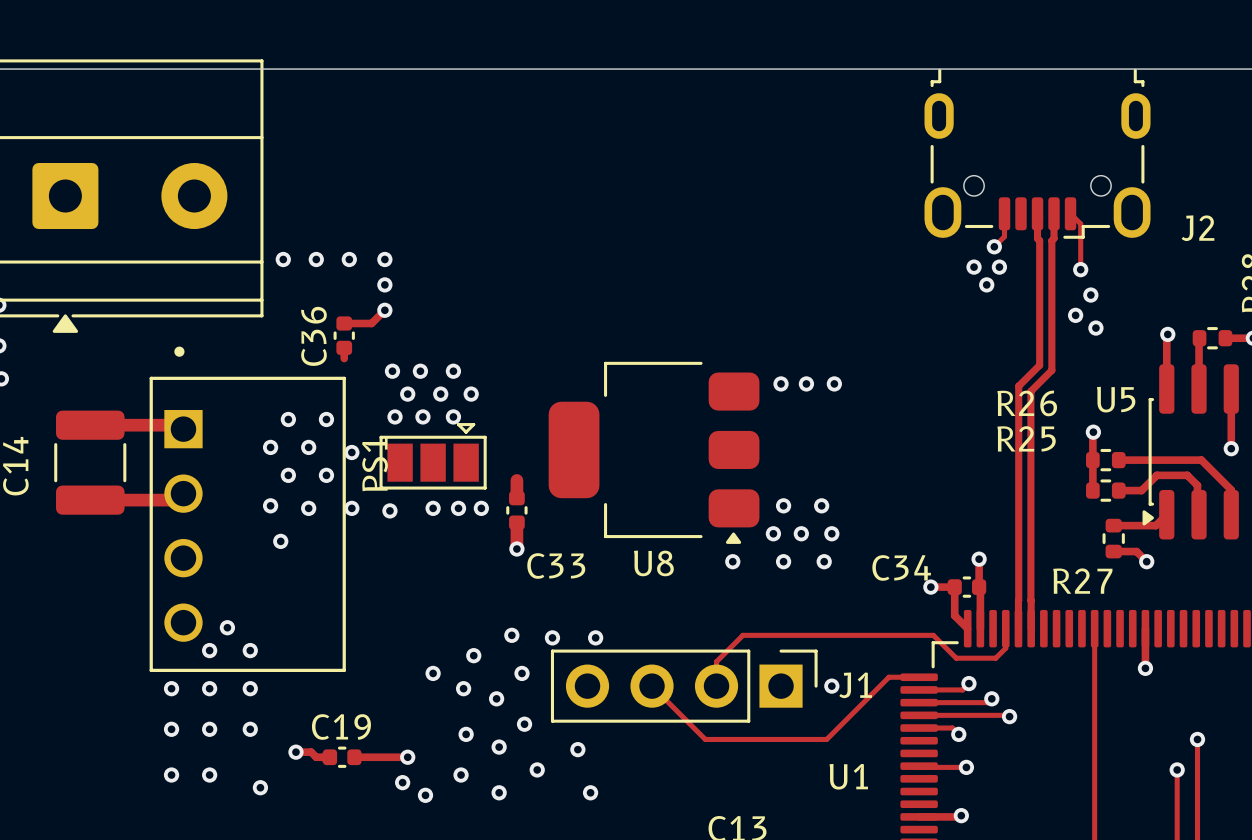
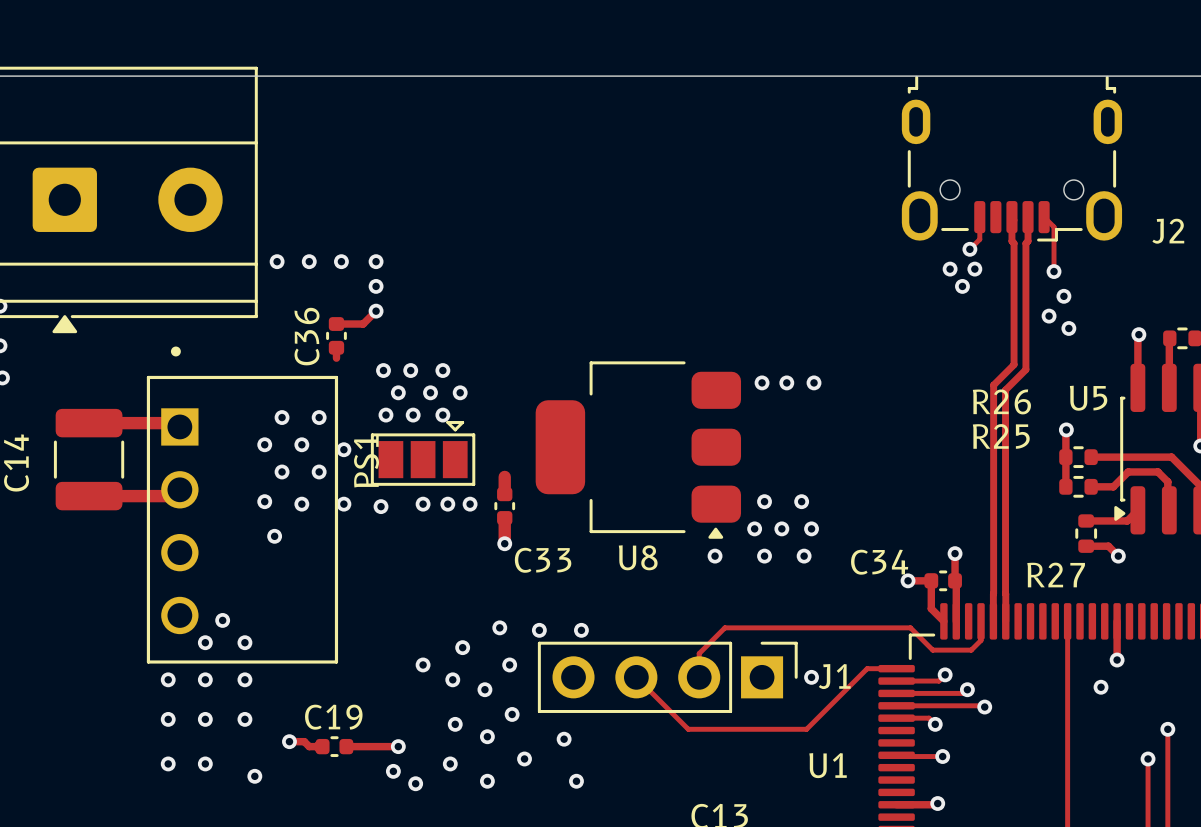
via: none -> (1101, 687)

